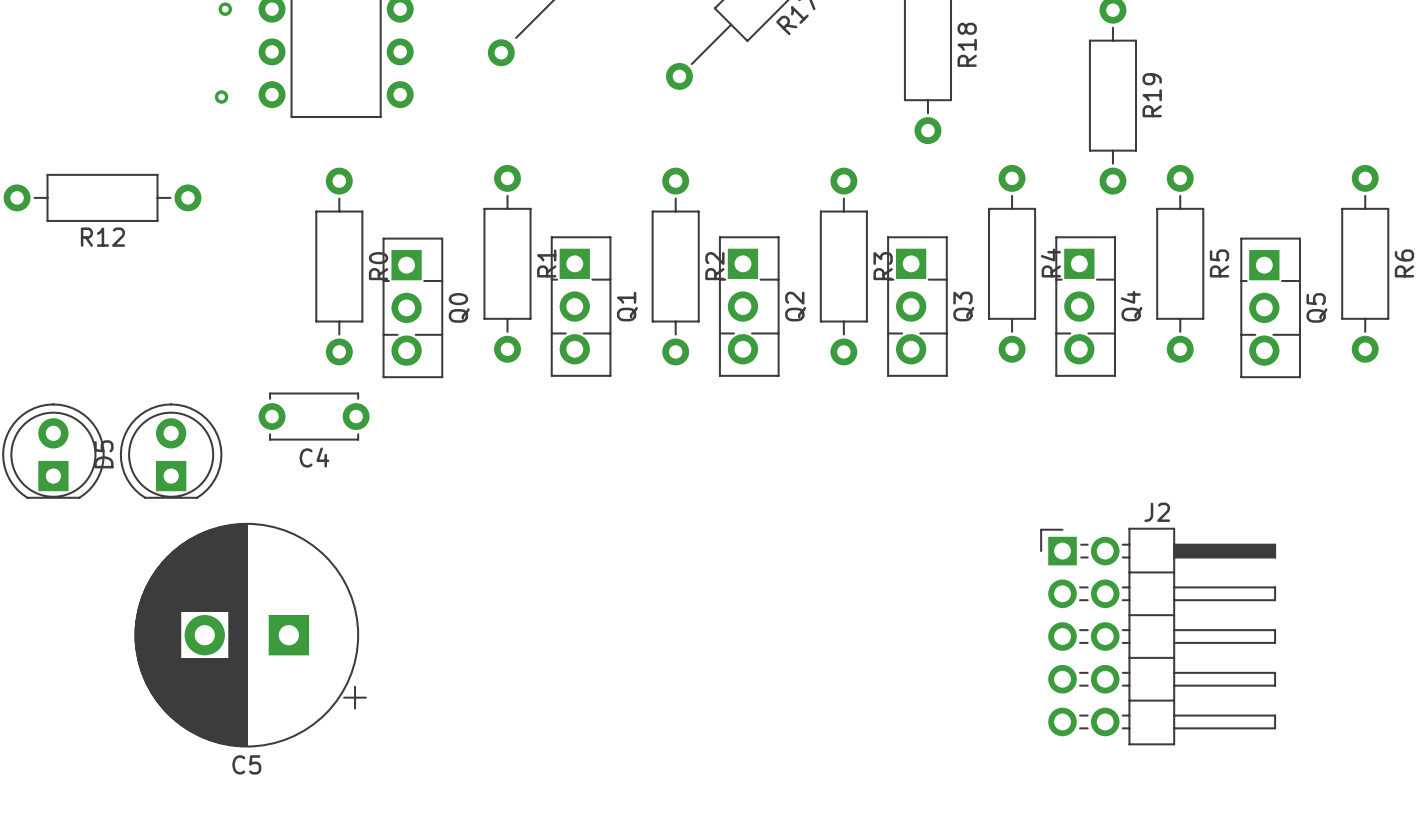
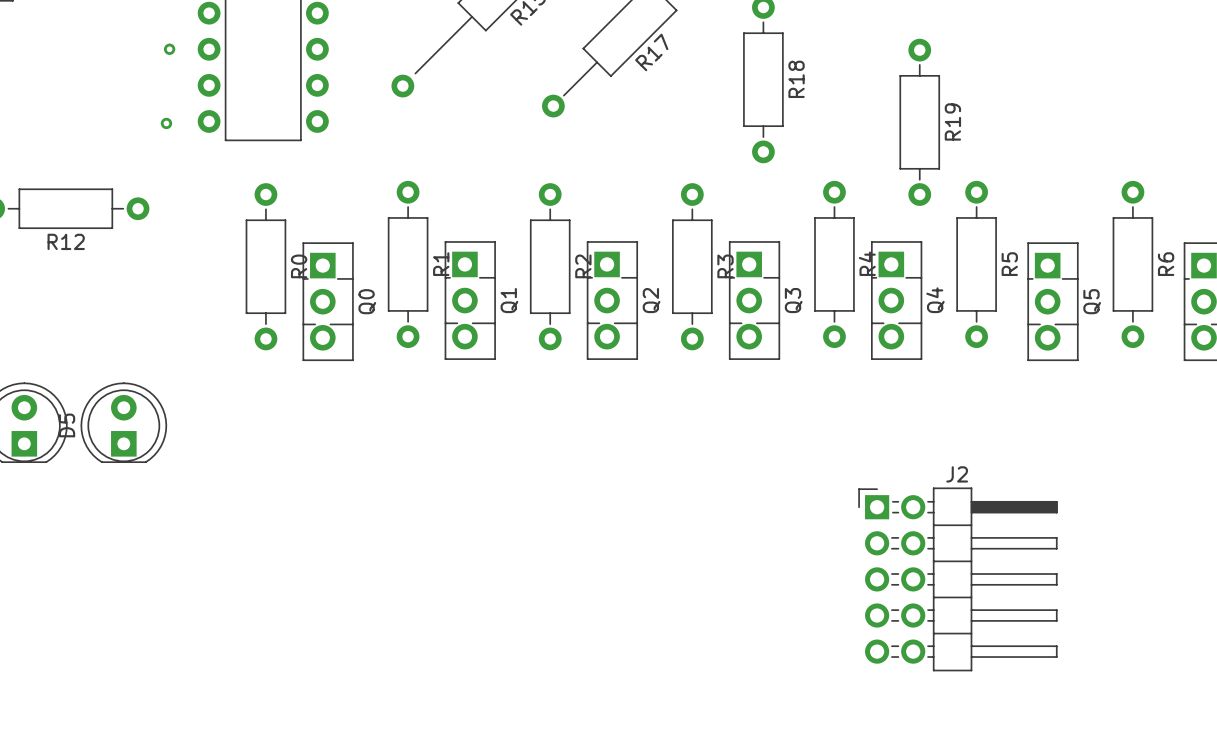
C4: (314, 416) -> none
C5: (250, 635) -> none

